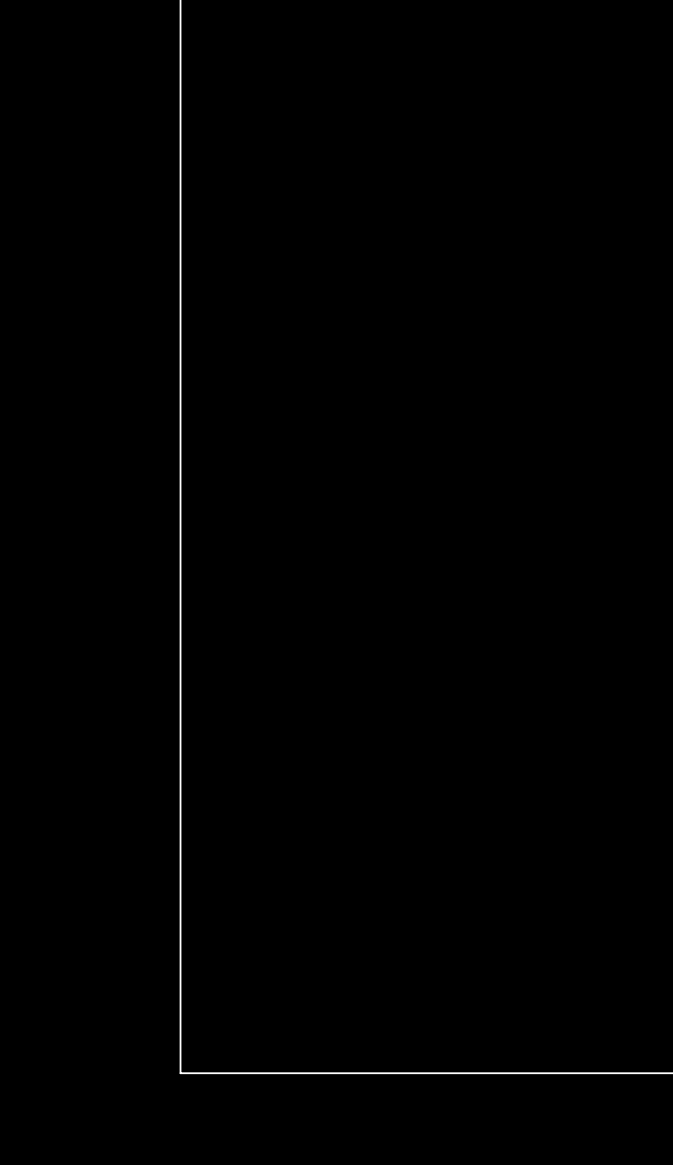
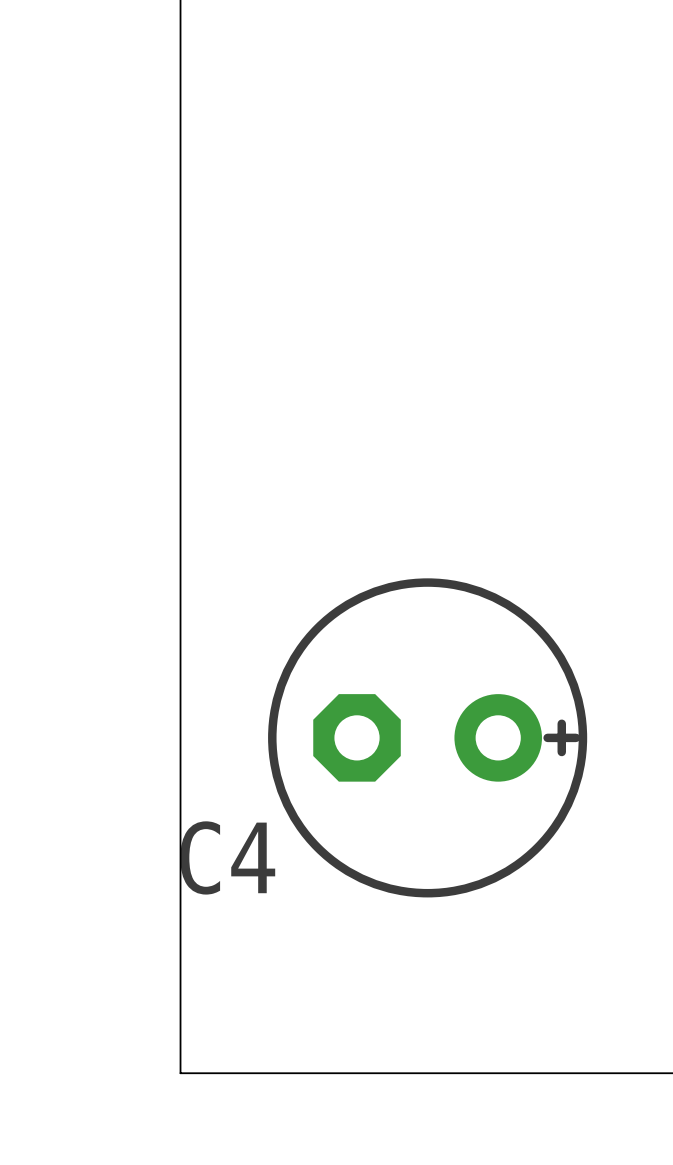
C4: none -> (427, 737)

